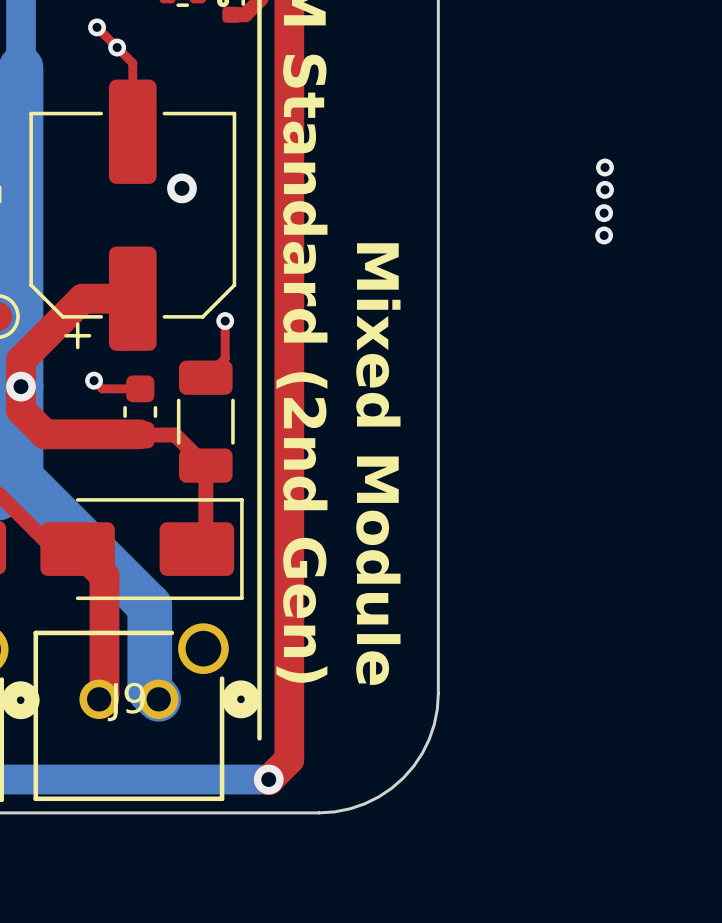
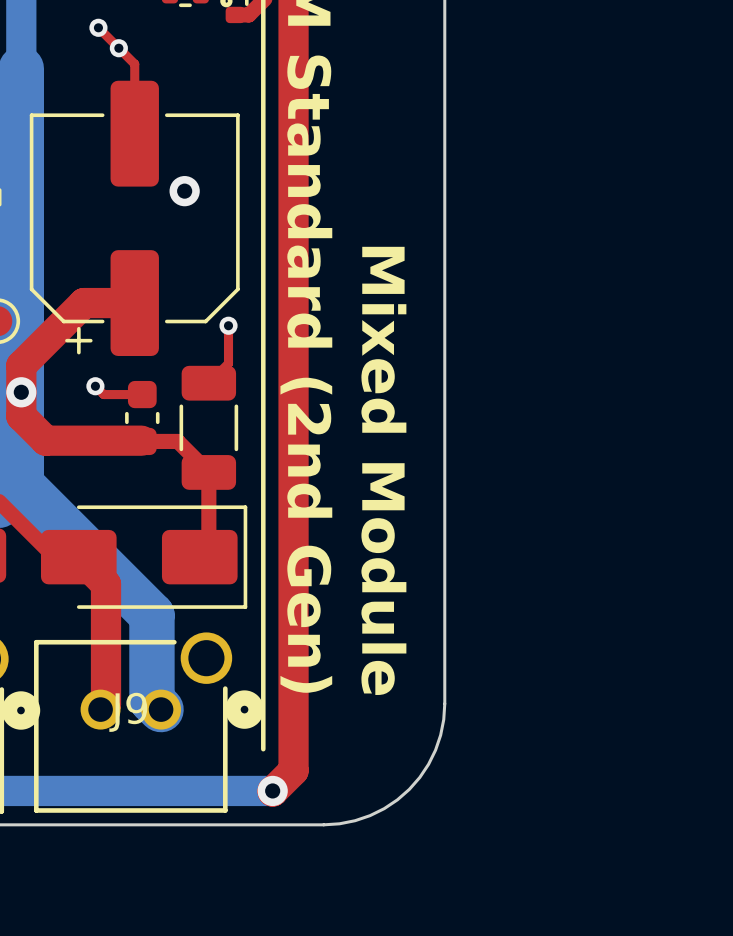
via: (604, 167) -> none
via: (604, 189) -> none
via: (604, 213) -> none
via: (604, 235) -> none

